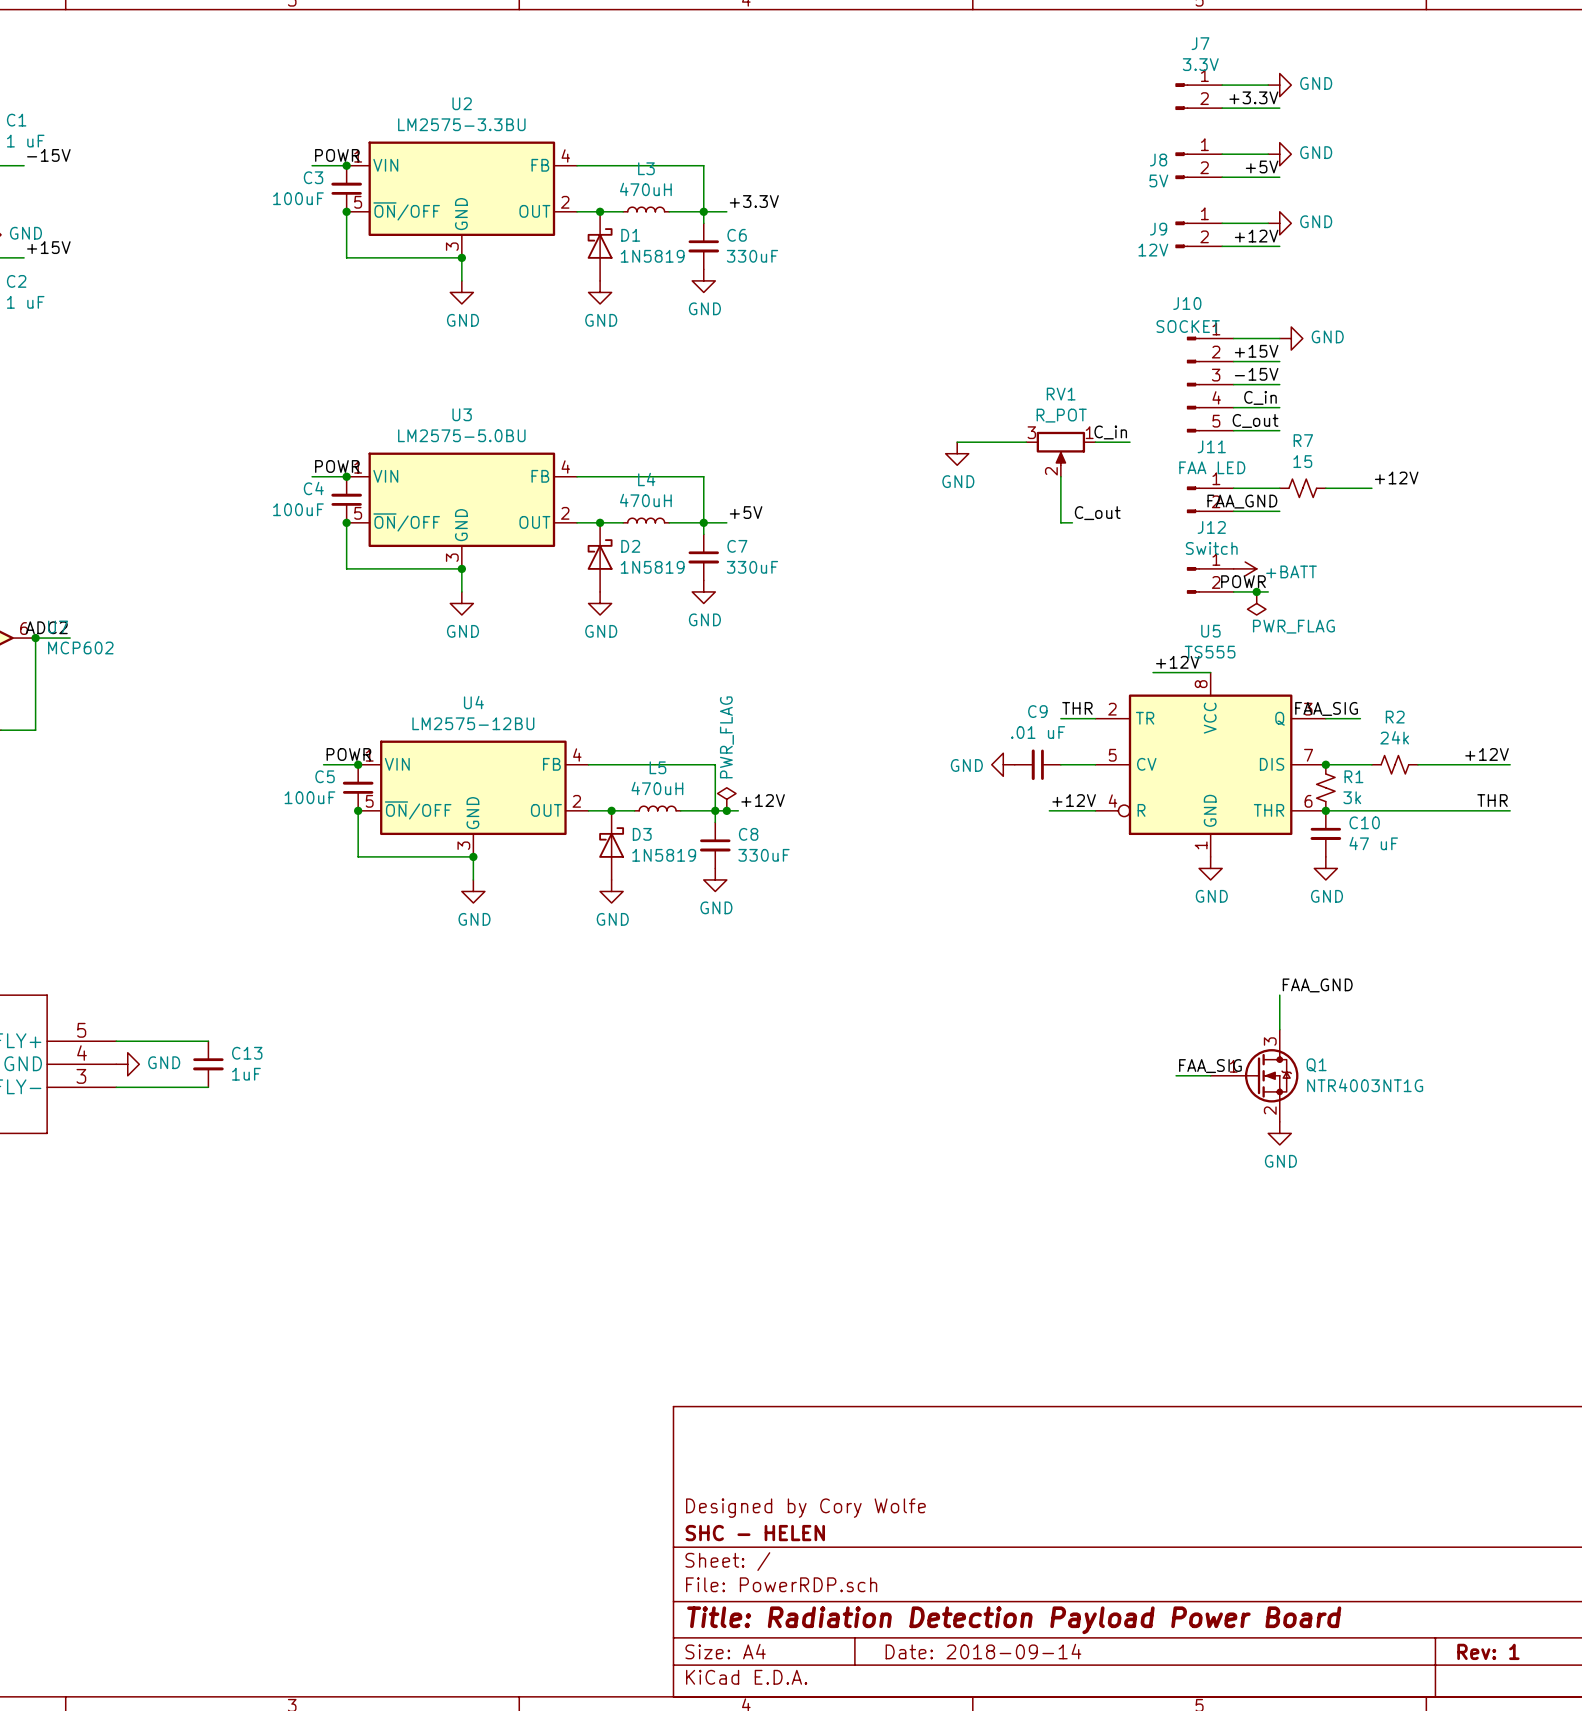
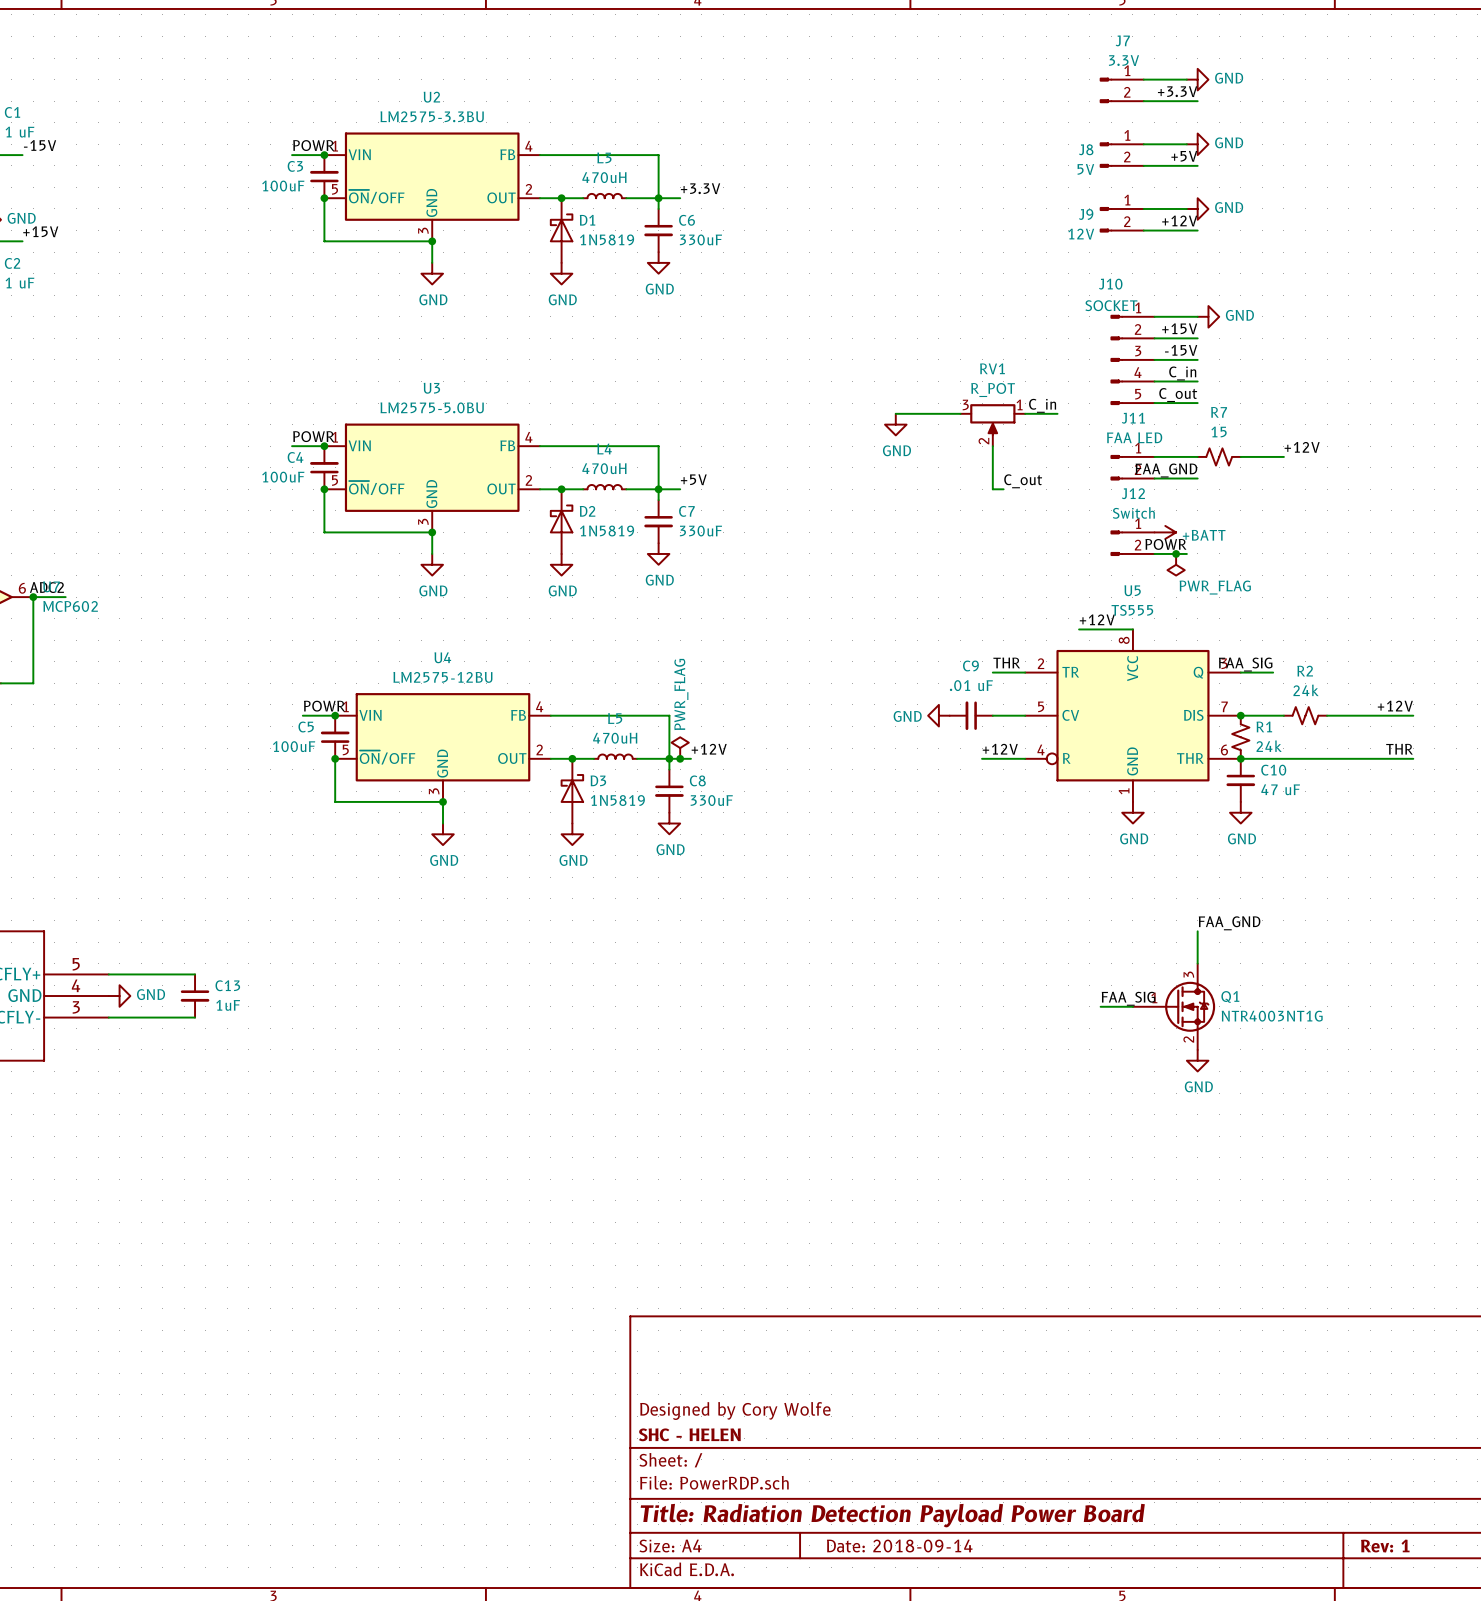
R1 value: 3k (1352, 797) -> 24k (1269, 746)

